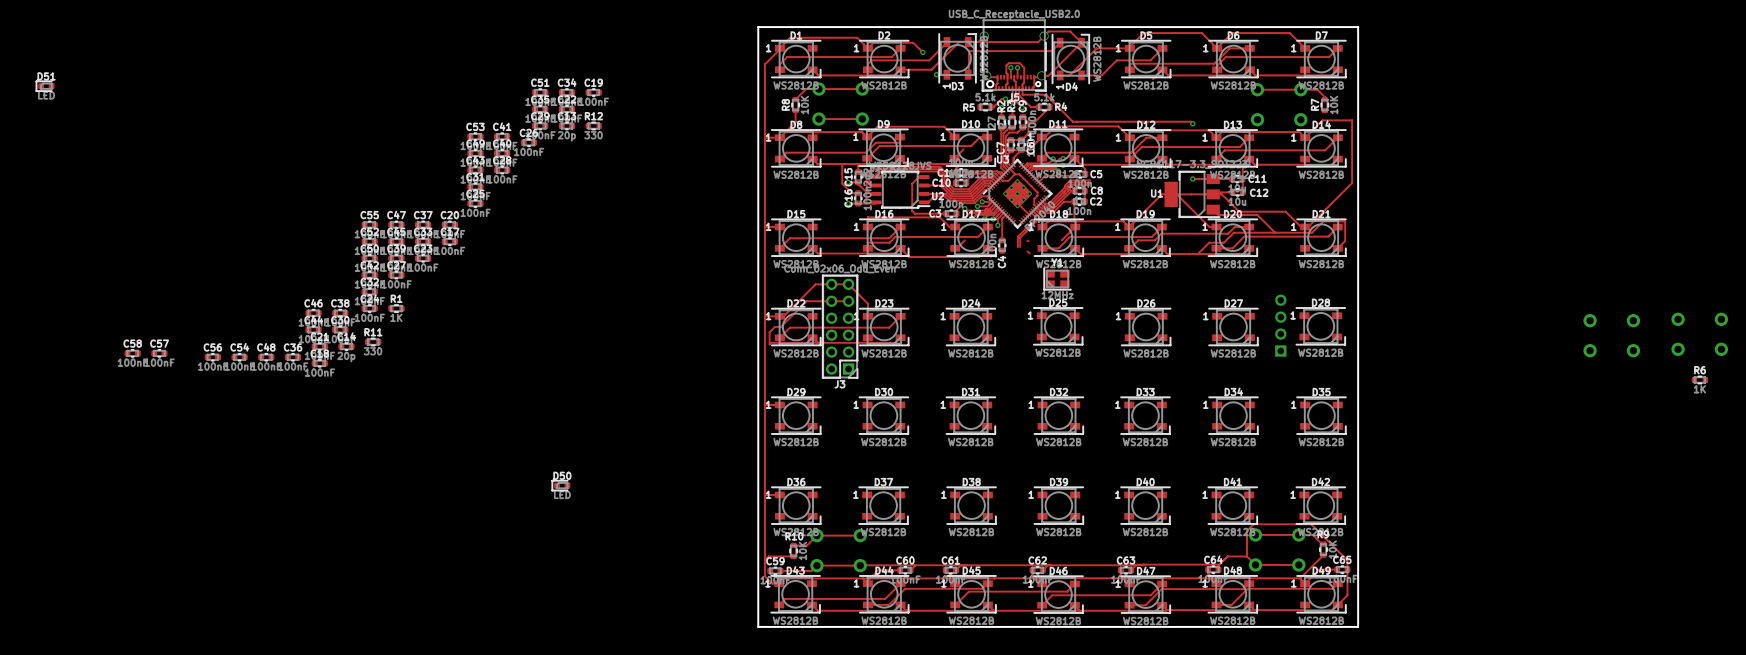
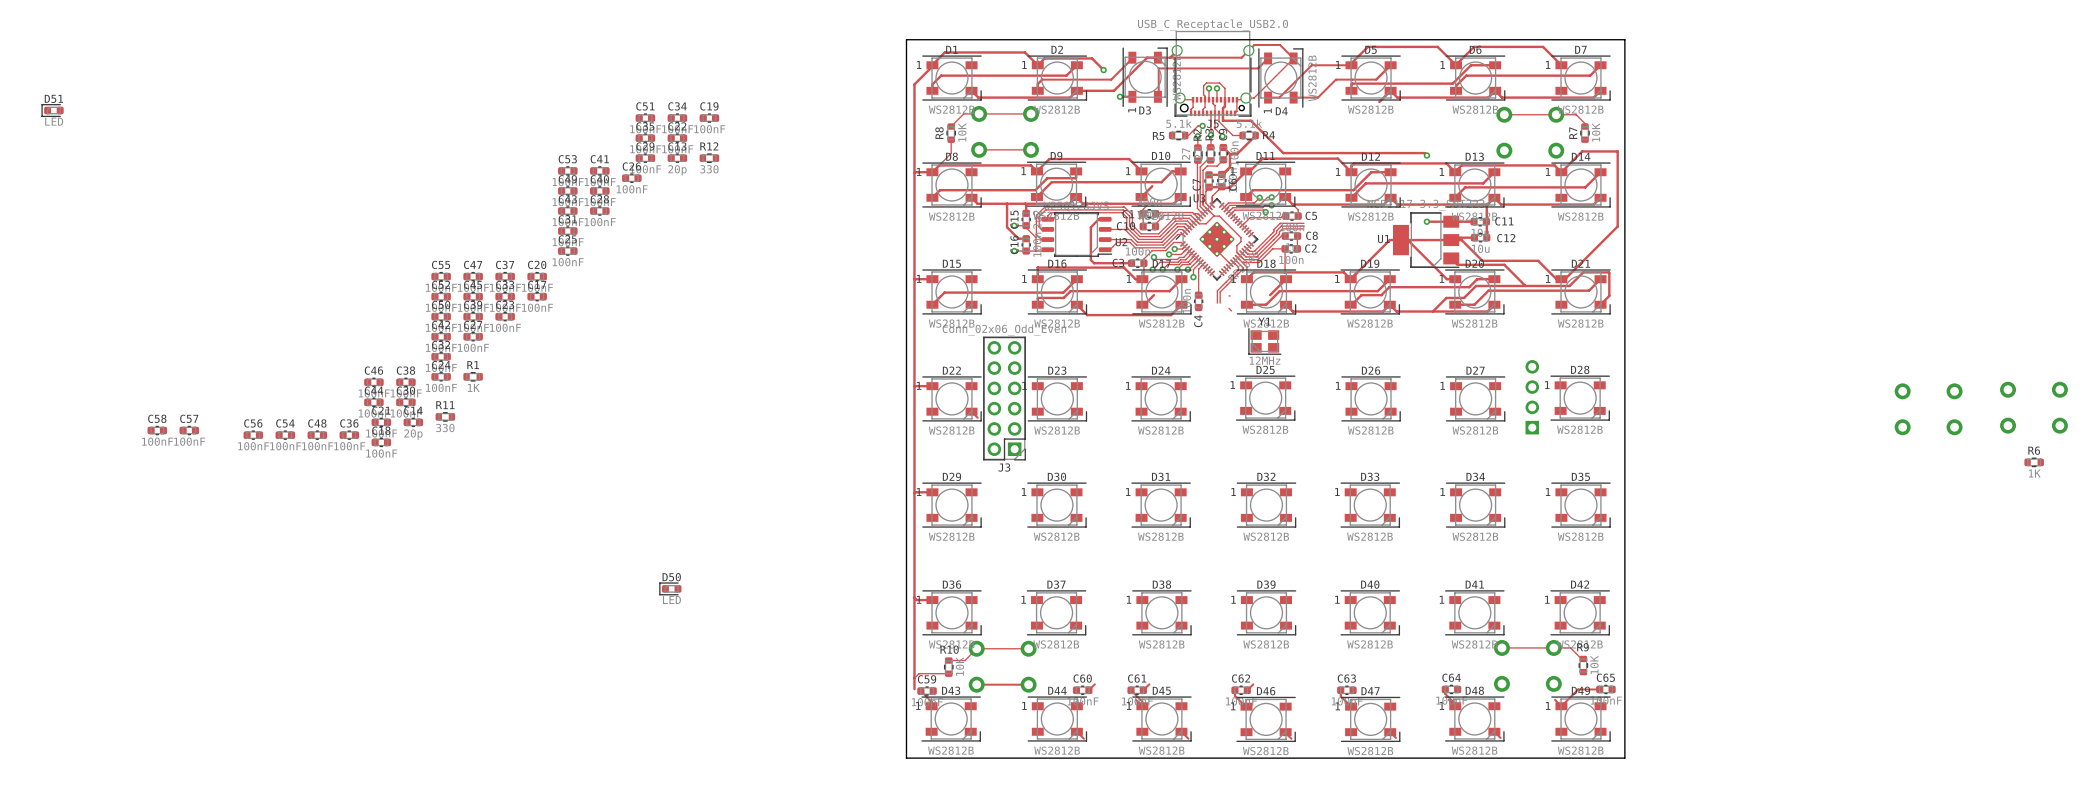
track: (812, 248) (817, 253) (895, 253) (900, 248) -> none
track: (848, 301) (806, 301) (780, 327) (774, 327) (769, 332) (769, 344) (895, 342) (900, 337) -> none
track: (779, 316) (783, 316) (815, 284) (848, 284) (867, 303) (867, 316) -> none
track: (900, 316) (889, 327) (789, 327) (779, 337) -> none
track: (1323, 555) (1300, 578) (784, 578) (779, 583) (772, 583) (764, 576) (764, 569) -> none
track: (1246, 556) (1246, 530) (1253, 524) (1311, 524) (1347, 560) (1347, 595) (1332, 610) (817, 610) (811, 604) -> none
track: (1246, 556) (1255, 564) (1298, 564) -> none
track: (1246, 556) (1227, 556) (1218, 565) (1218, 569) -> none
track: (1143, 564) (860, 565) -> none
track: (1219, 564) (1136, 564) (1131, 570) -> none
track: (816, 565) (811, 570) (780, 570) -> none
track: (900, 570) (878, 570) (867, 580) (867, 583) (862, 578) -> none
track: (900, 583) (885, 598) (785, 598) (779, 604) -> none
track: (987, 583) (982, 588) (905, 588) (888, 604) (867, 604) -> none
track: (1074, 583) (1067, 591) (968, 591) (955, 604) -> none
track: (1162, 583) (1150, 595) (1052, 595) (1042, 605) -> none
track: (1249, 583) (1243, 589) (1161, 589) (1145, 605) (1129, 605) -> none
track: (1337, 583) (1332, 588) (1247, 588) (1231, 604) (1216, 604) -> none

